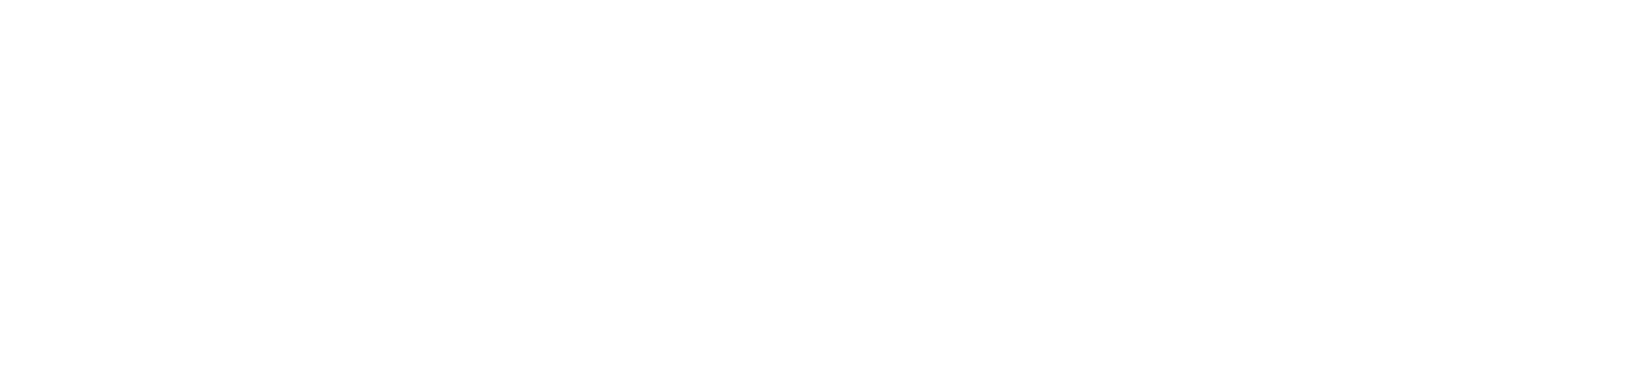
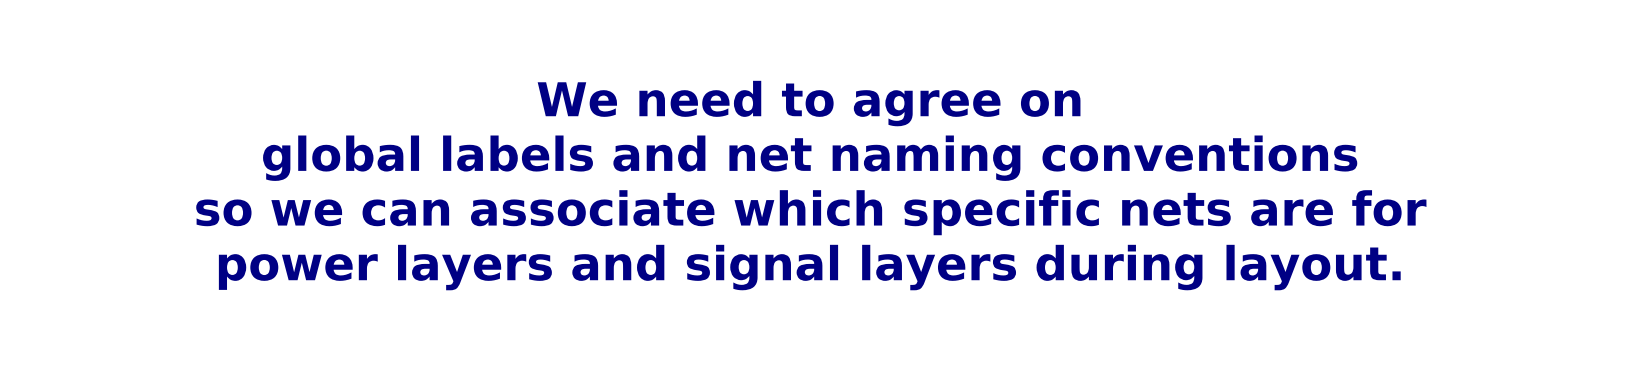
text: none -> We need to agree on (809, 103)
text: none -> global labels and net naming conventions (810, 158)
text: none -> so we can associate which specific nets are for (811, 212)
text: none -> power layers and signal layers during layout. (809, 267)

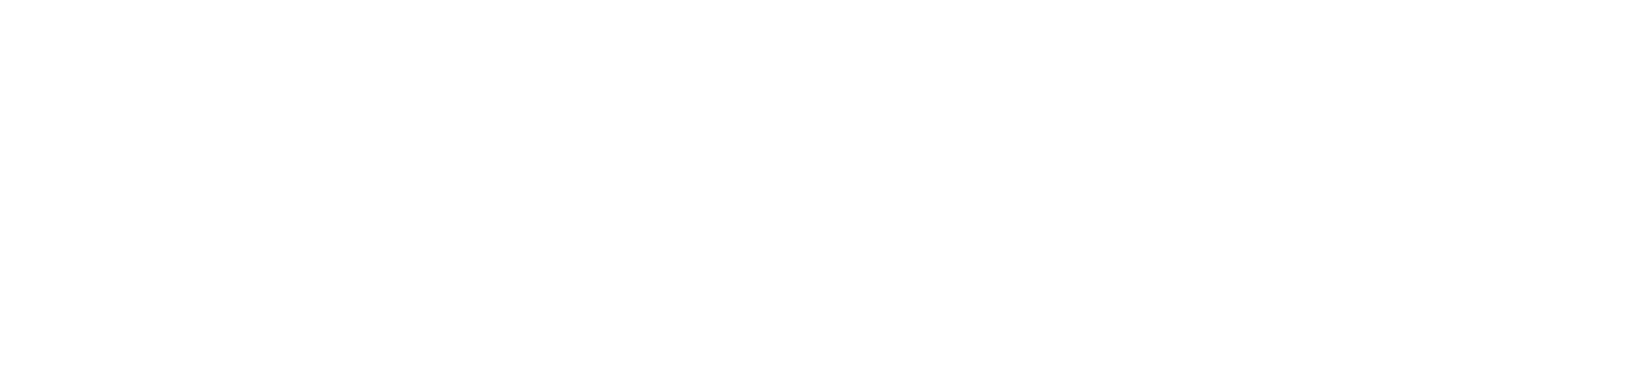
text: We need to agree on (809, 103) -> none
text: global labels and net naming conventions (810, 158) -> none
text: so we can associate which specific nets are for (811, 212) -> none
text: power layers and signal layers during layout. (809, 267) -> none

